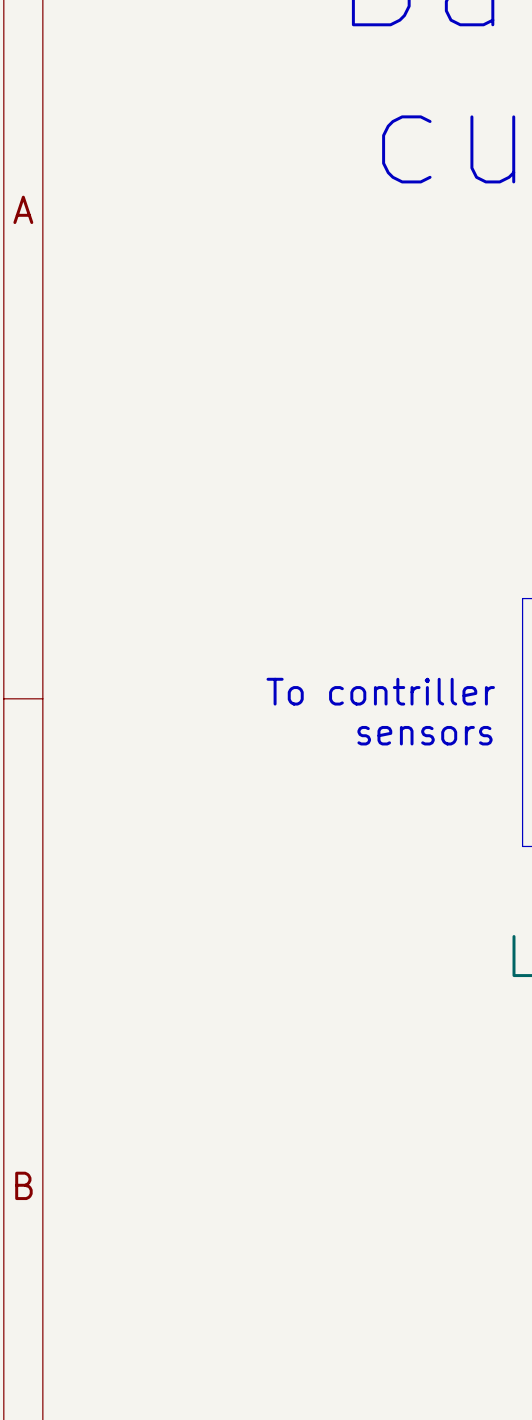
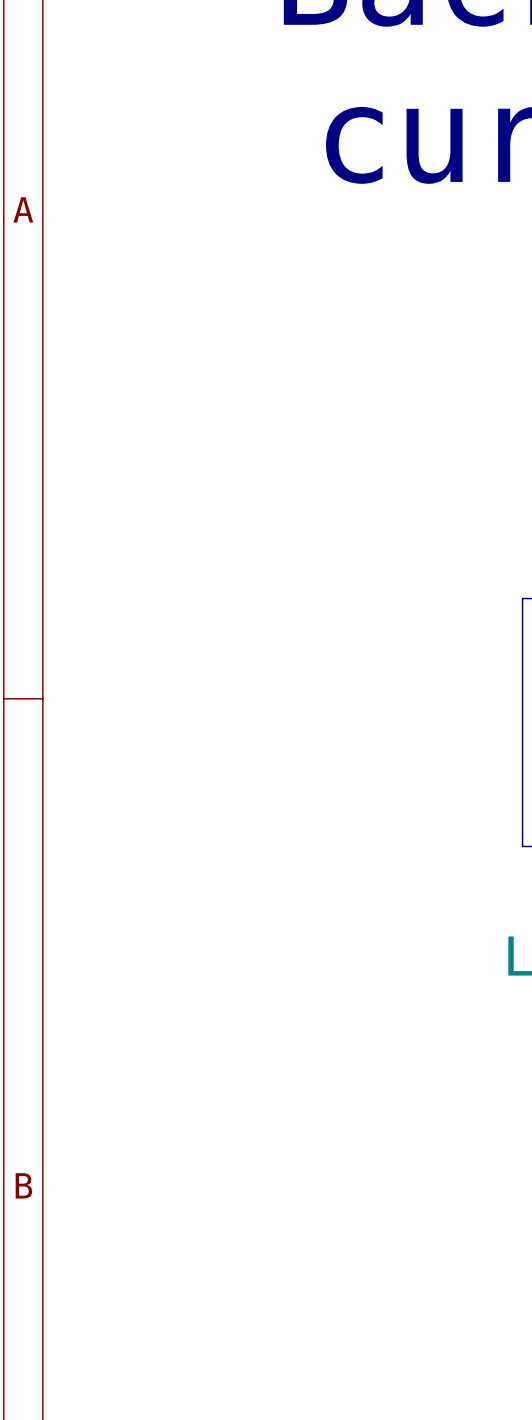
text: To contriller (380, 691) -> none
text: sensors (425, 735) -> none

